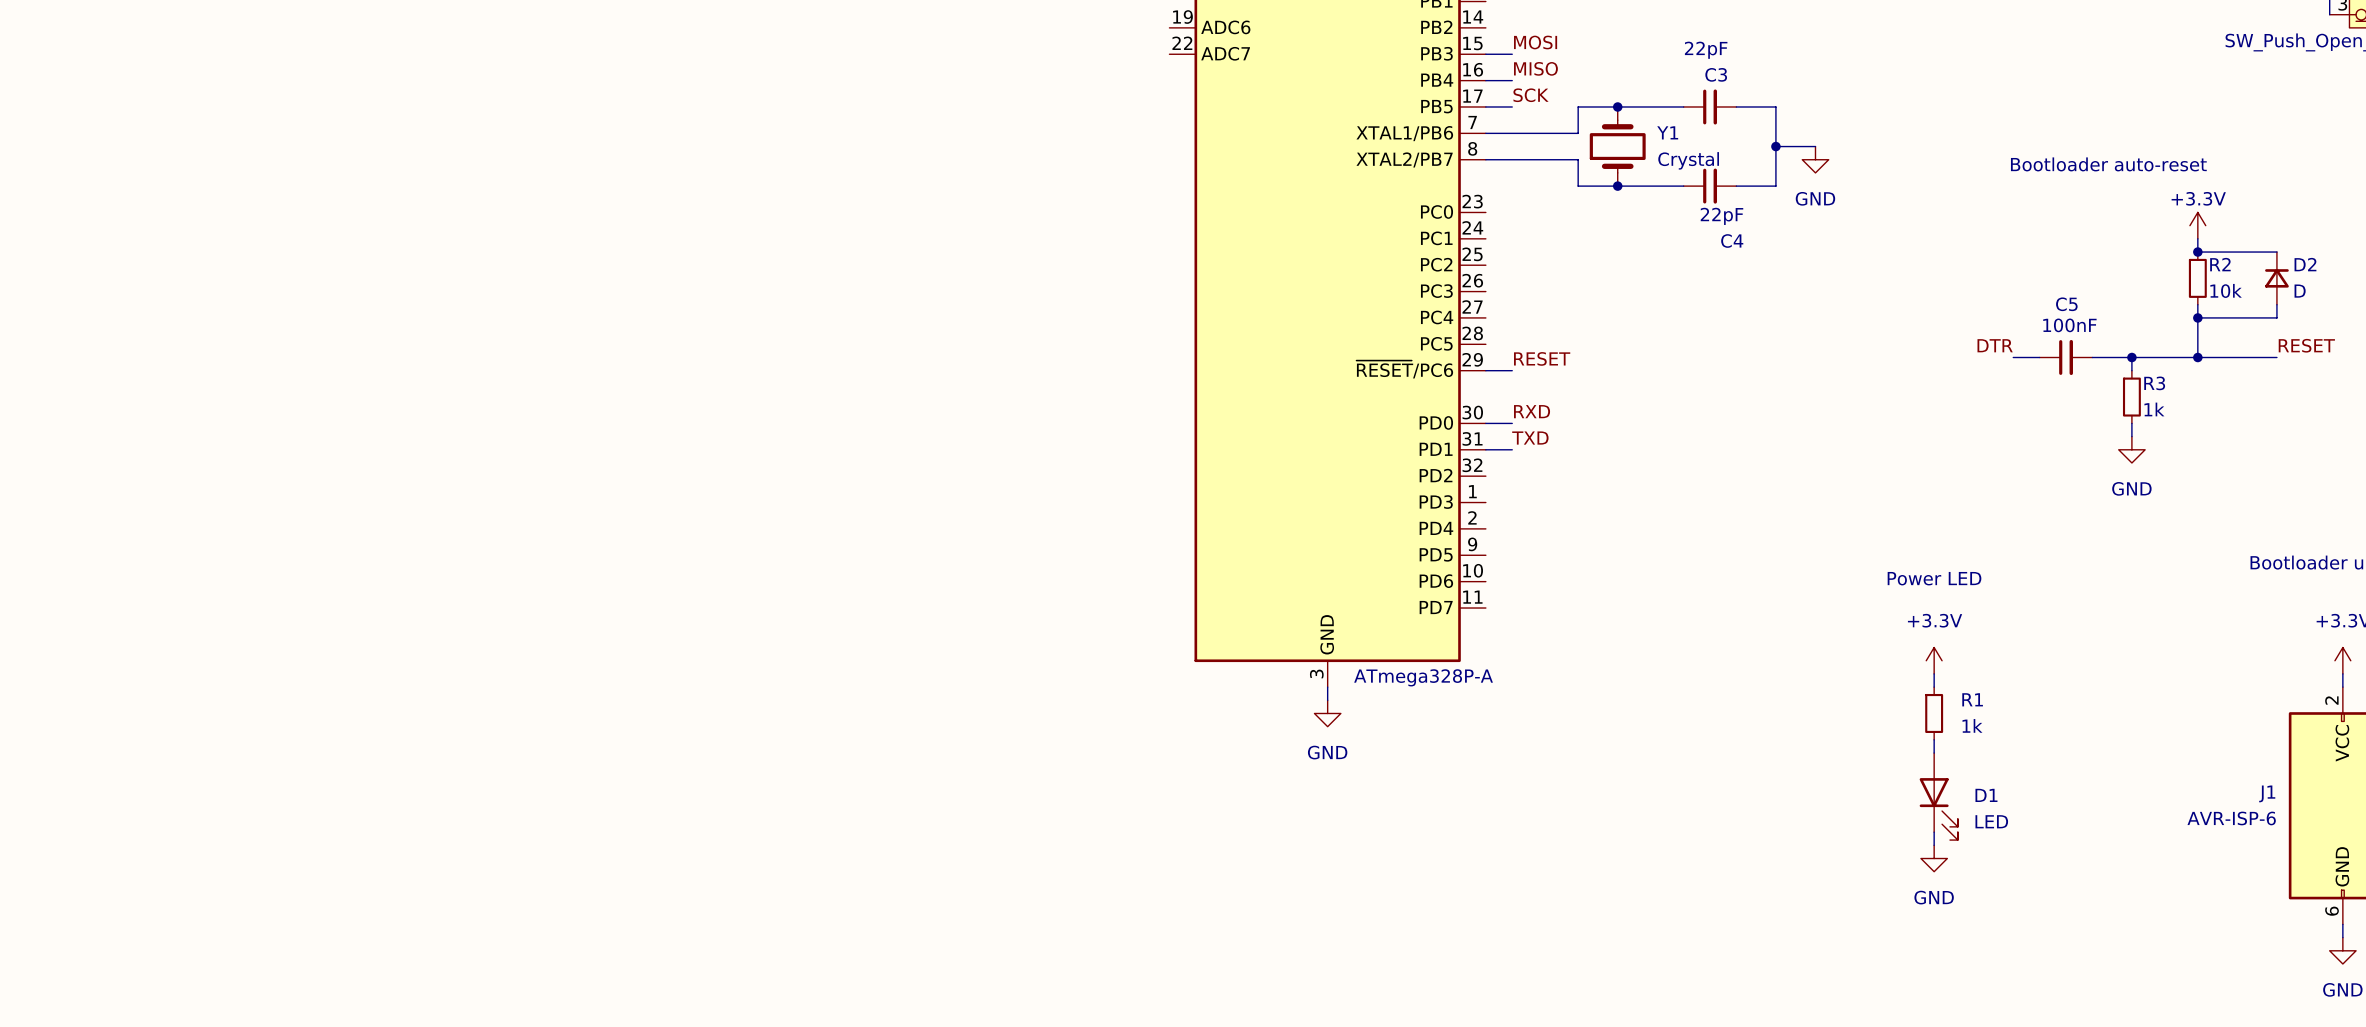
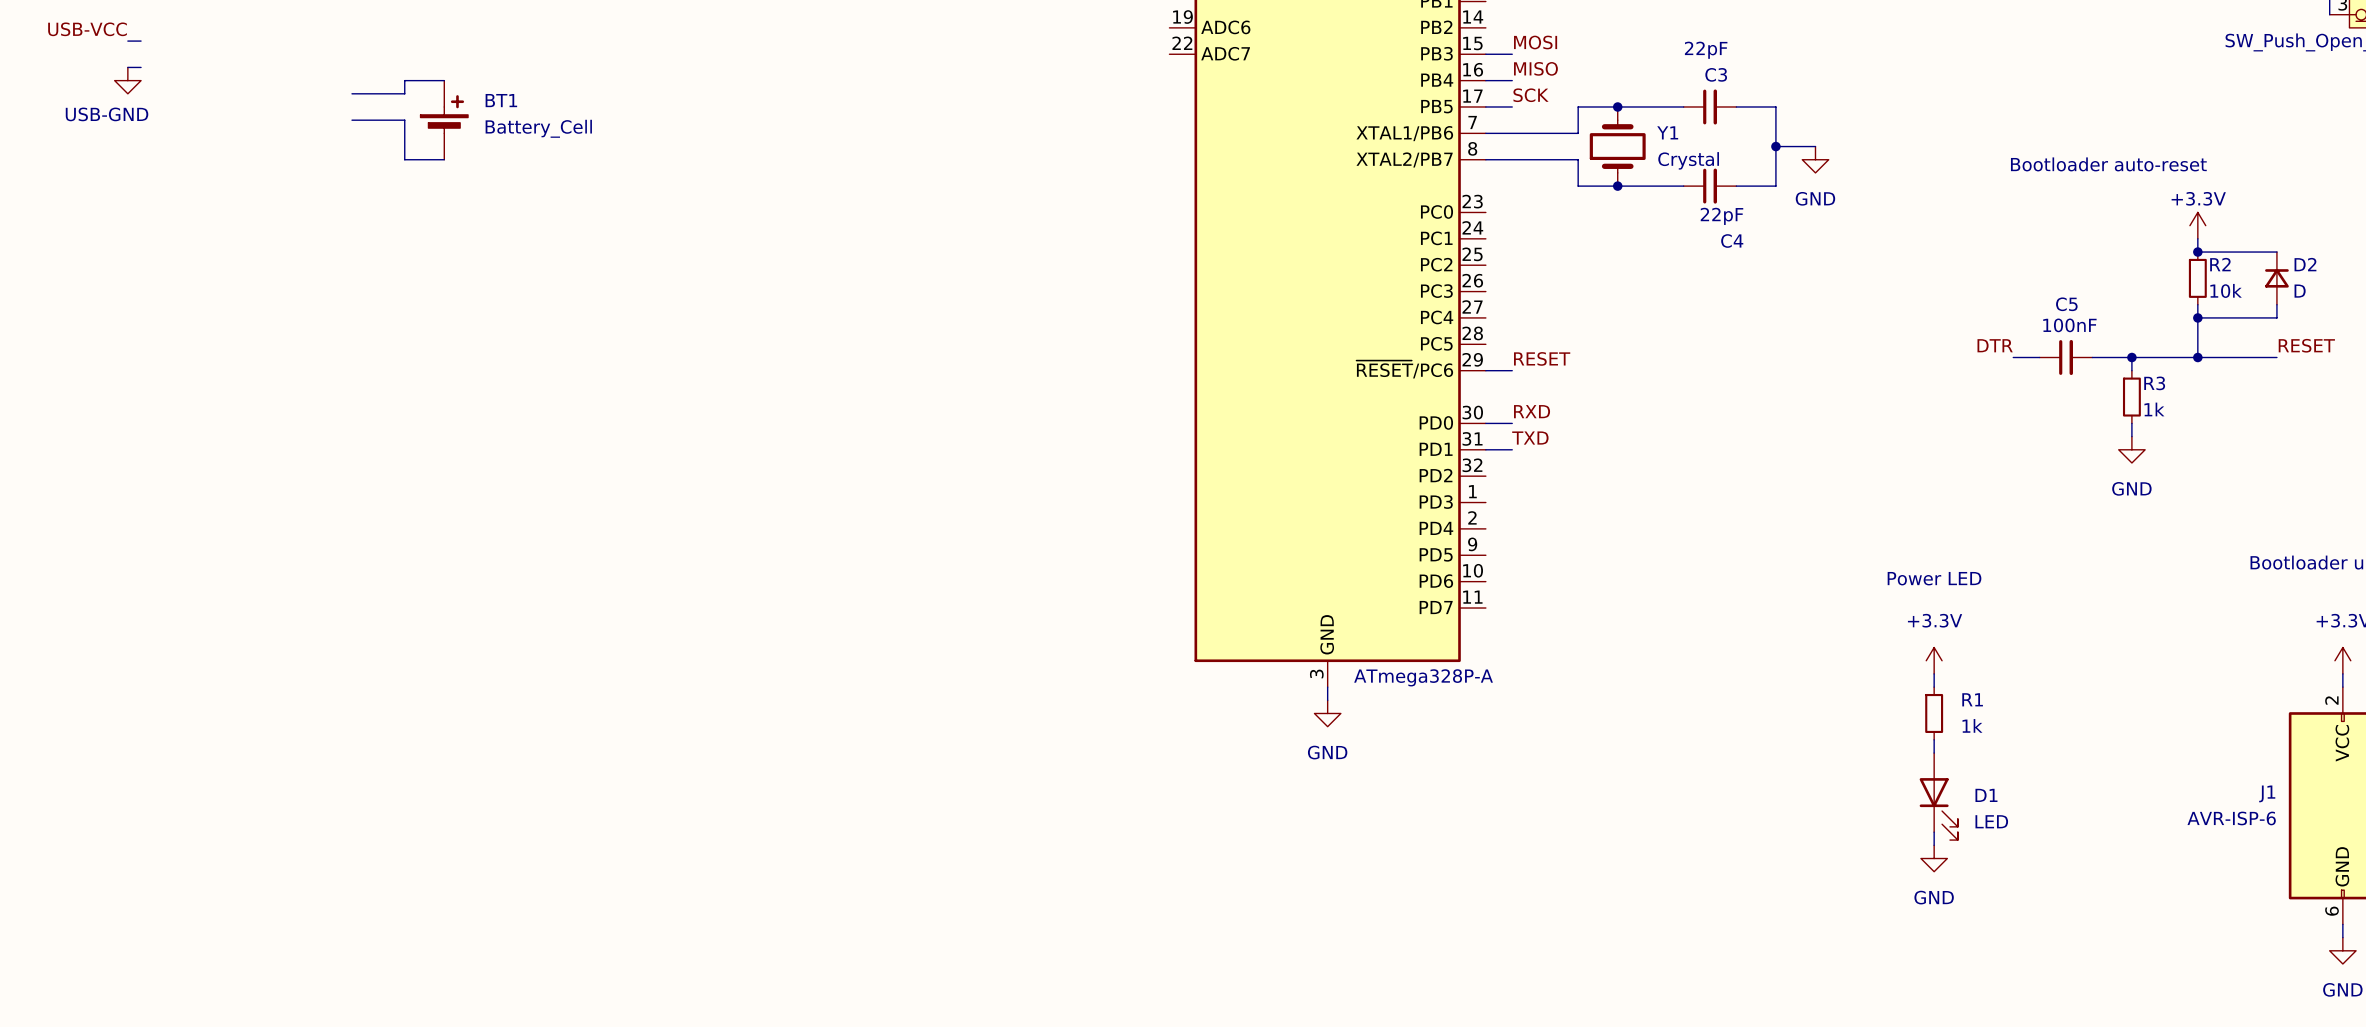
label: none -> USB-VCC (87, 29)
wire: none -> (127, 41) (141, 41)
wire: none -> (127, 67) (141, 67)
power symbol: none -> USB-GND (127, 80)
wire: none -> (444, 80) (404, 80) (404, 93) (352, 93)
wire: none -> (352, 120) (404, 120) (404, 159) (444, 159)
BT1: none -> Battery_Cell (444, 120)

